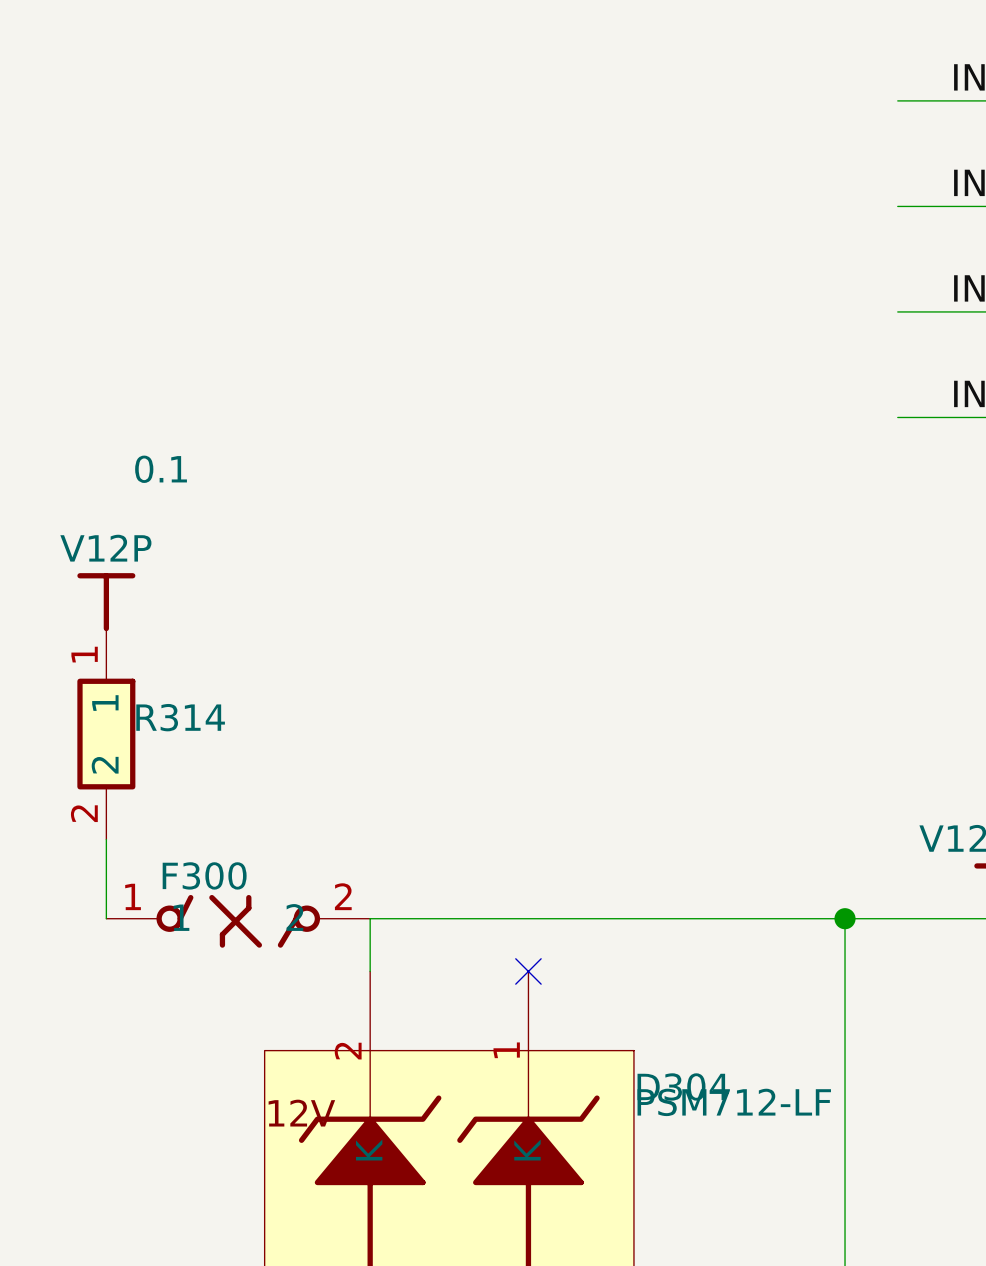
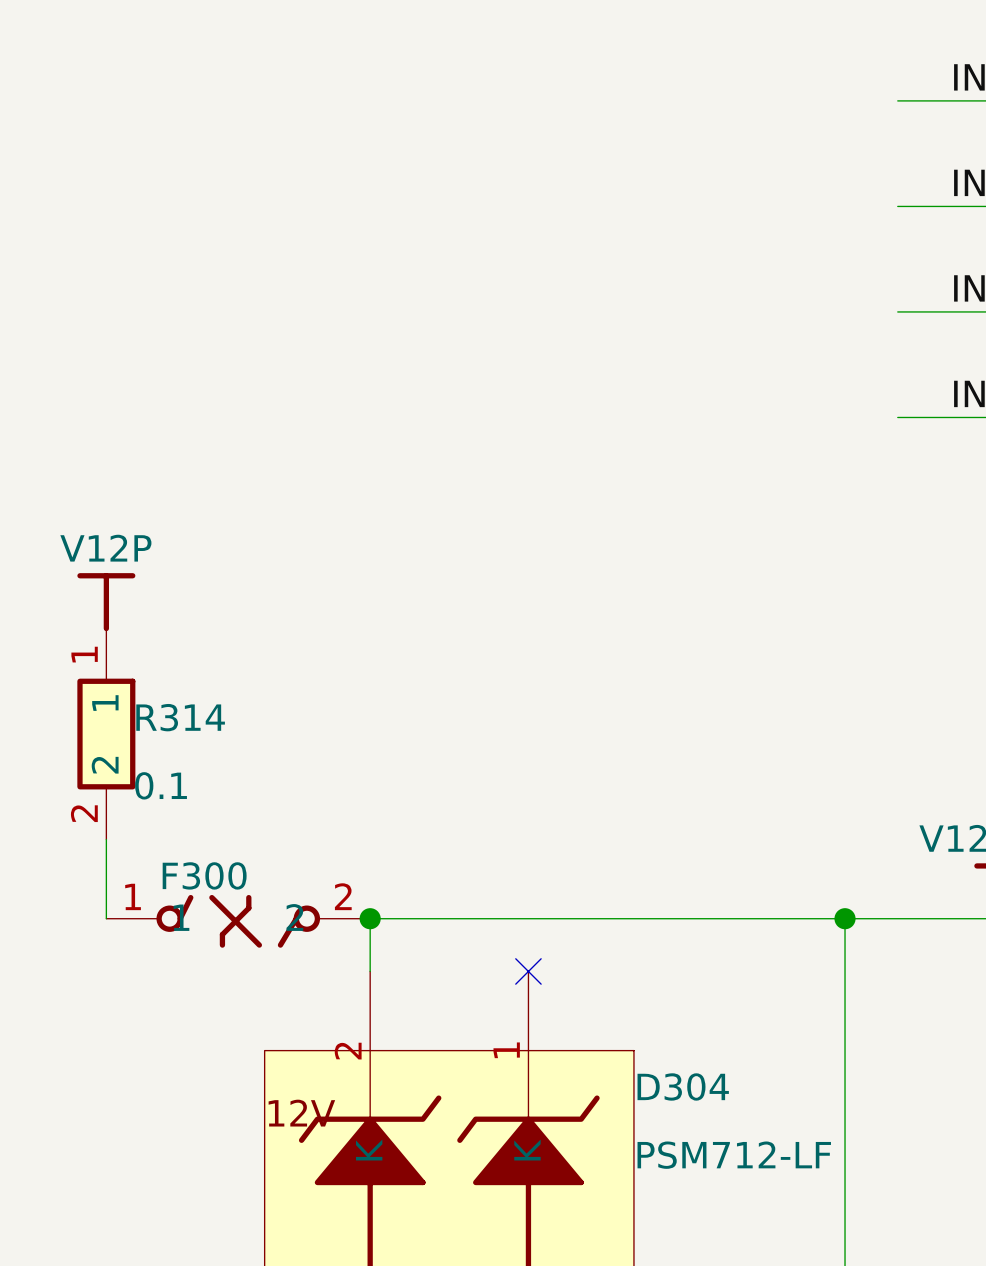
R314 text: 0.1 (161, 469) -> none
R314 value: none -> 0.1 (161, 785)
junction: none -> (370, 918)
D304 text: PSM712-LF (734, 1102) -> none
D304 value: none -> PSM712-LF (734, 1155)

